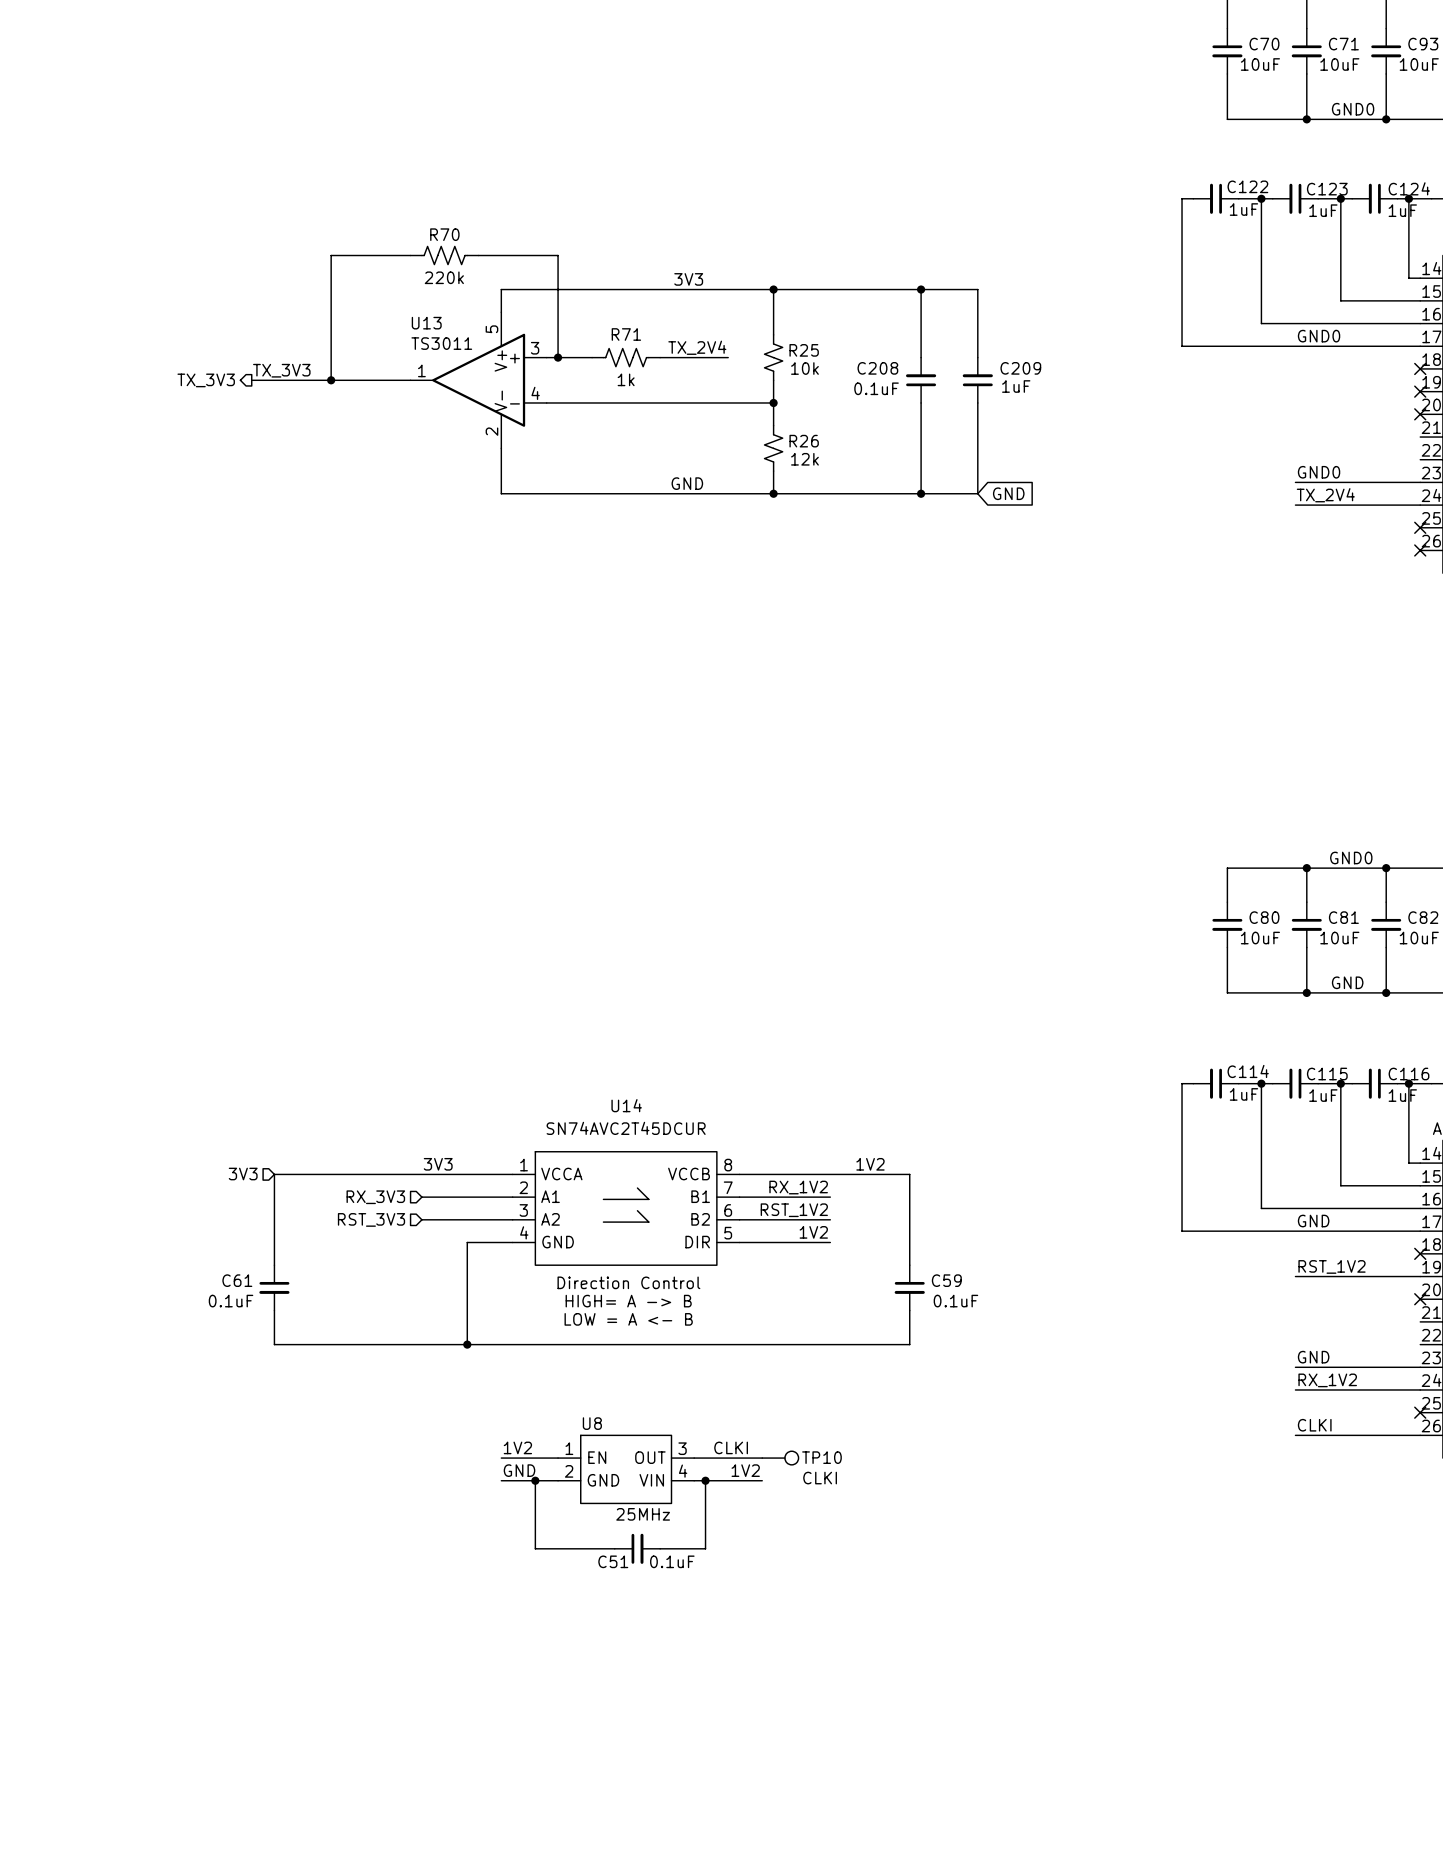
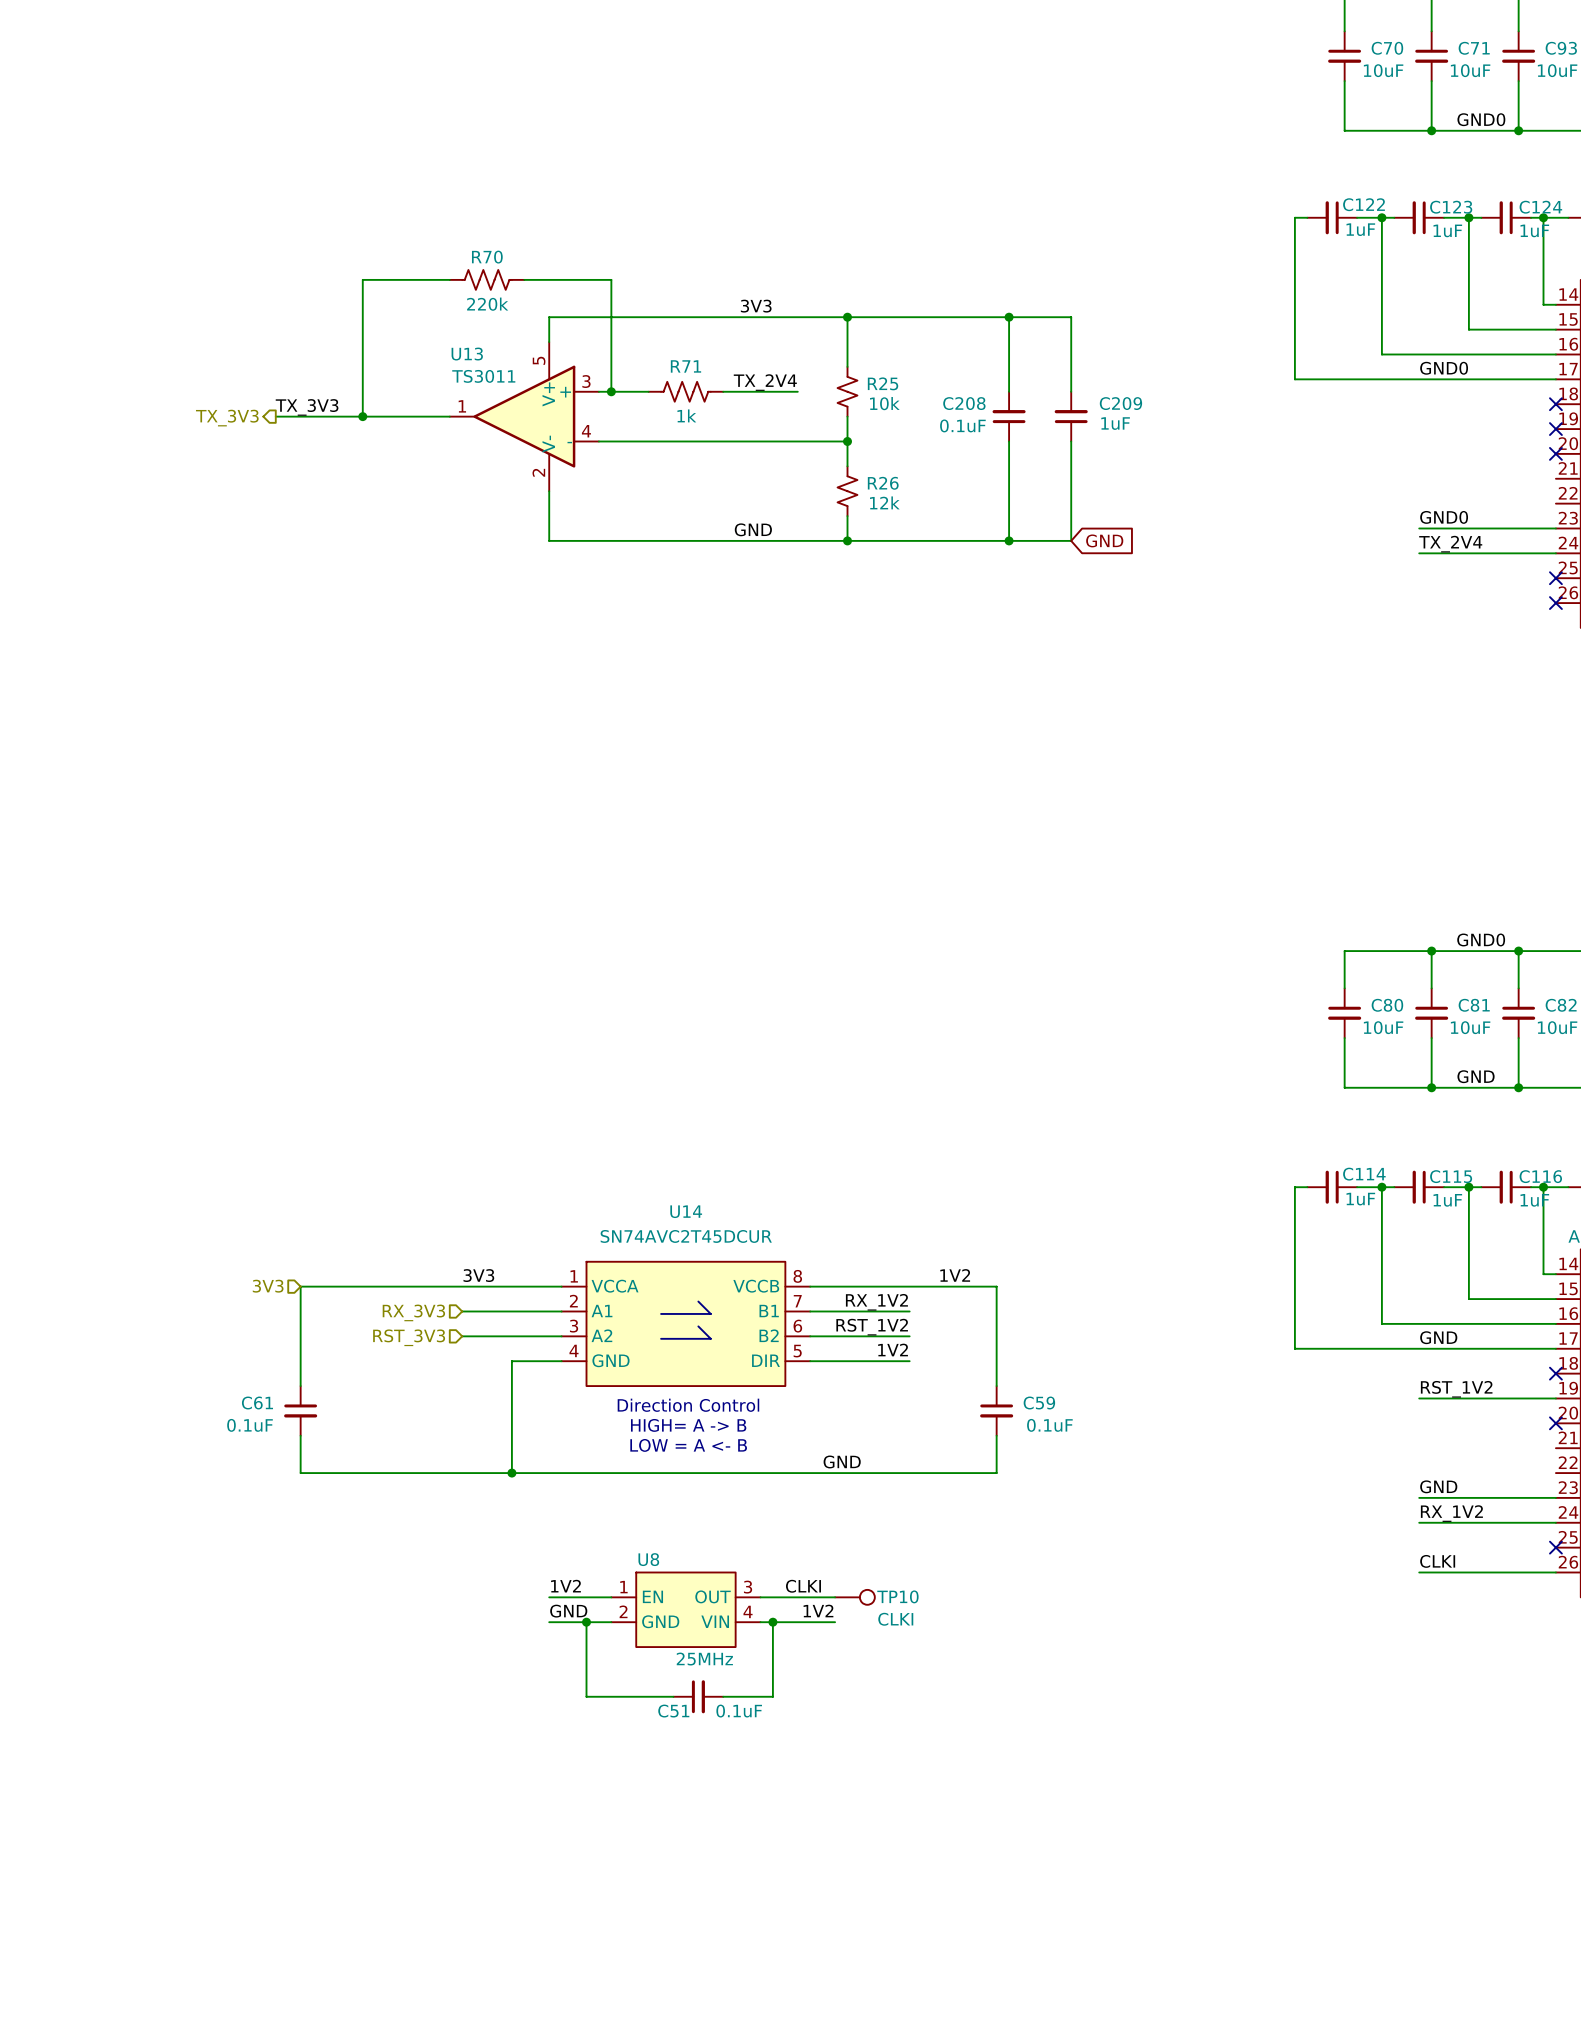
label: none -> GND (842, 1461)

